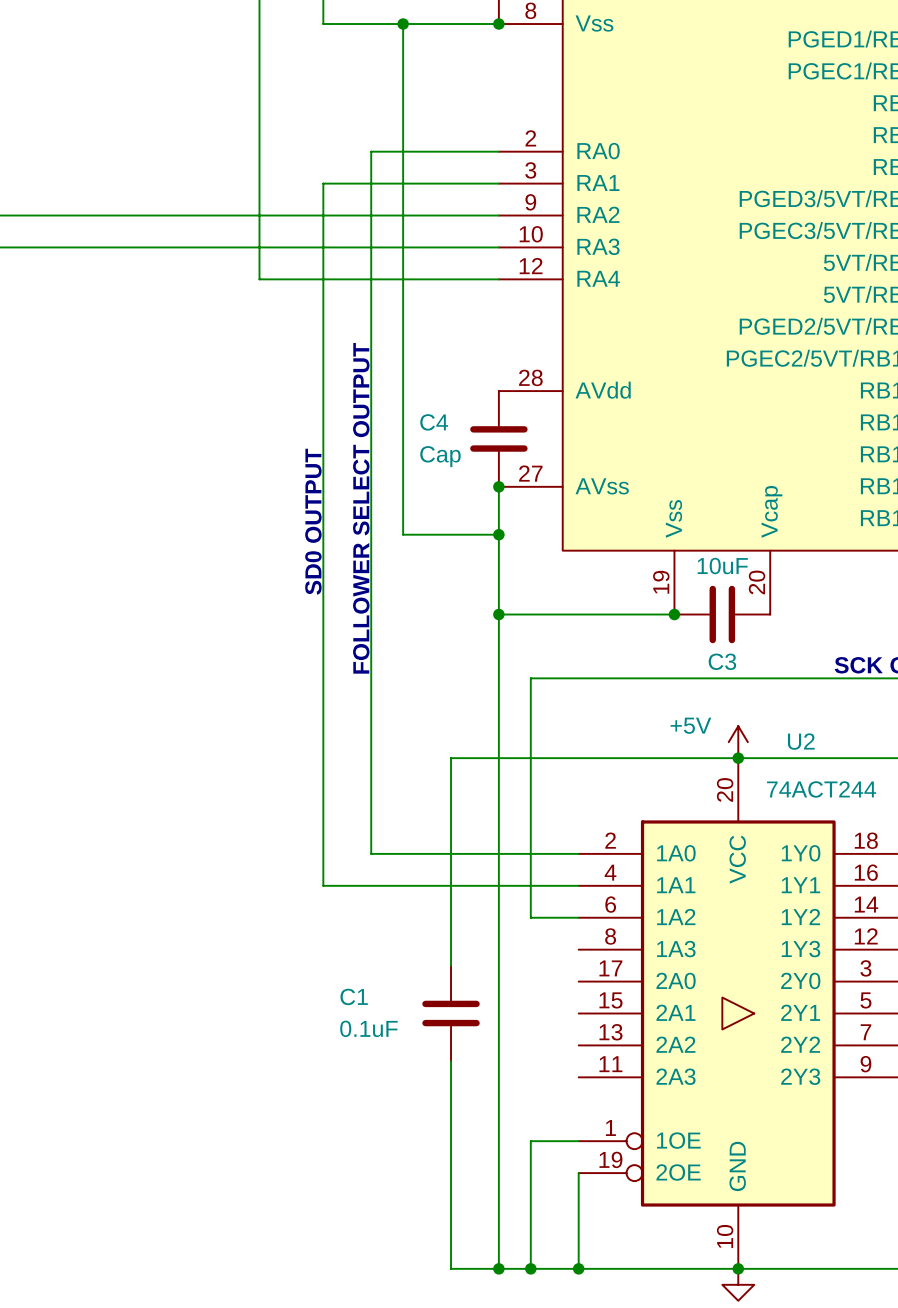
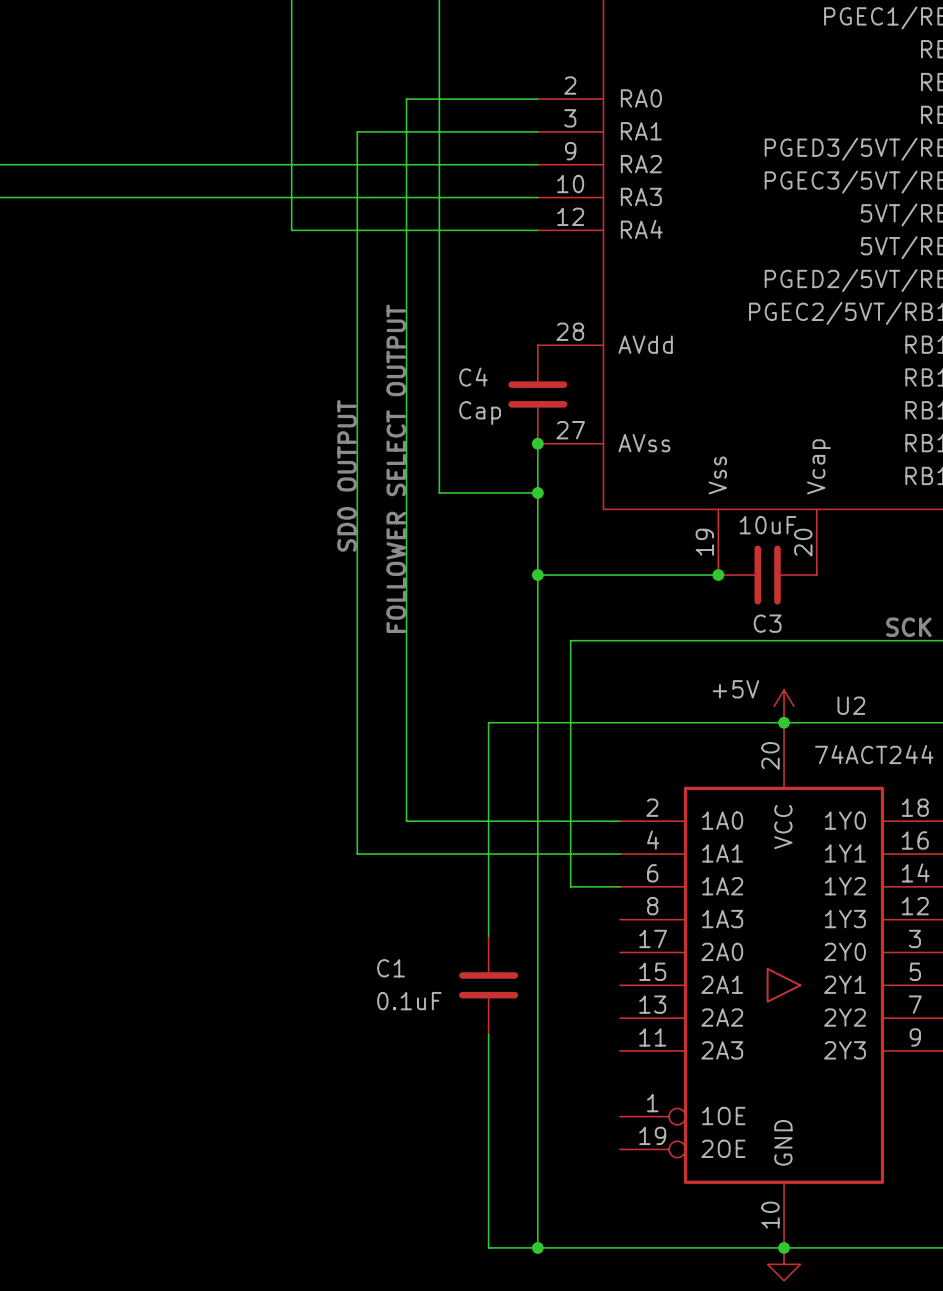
wire: (578, 1141) (530, 1141) (530, 1268) -> none
wire: (578, 1173) (578, 1268) -> none
junction: (530, 1268) -> none
junction: (578, 1268) -> none

